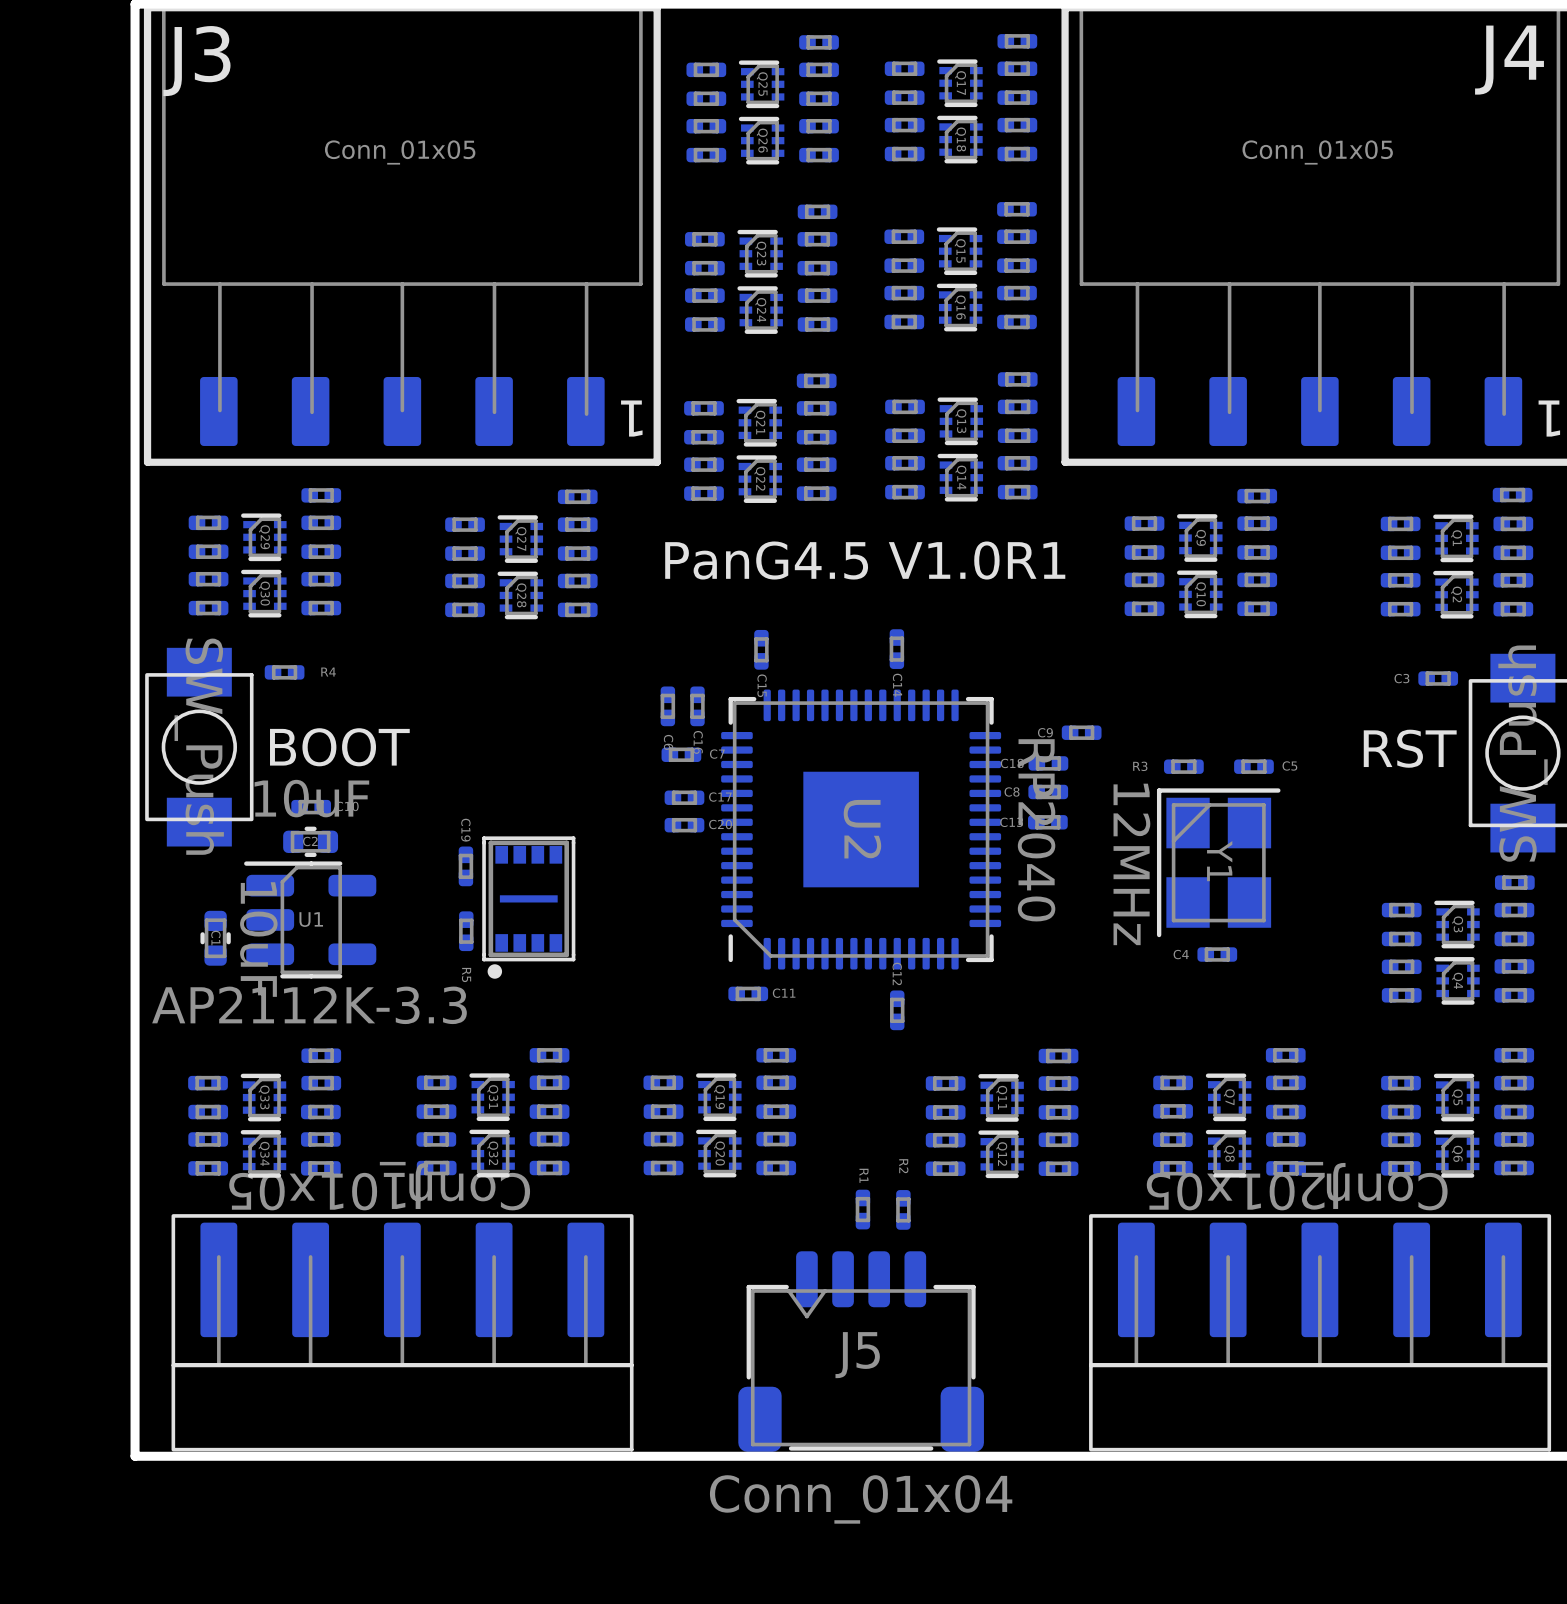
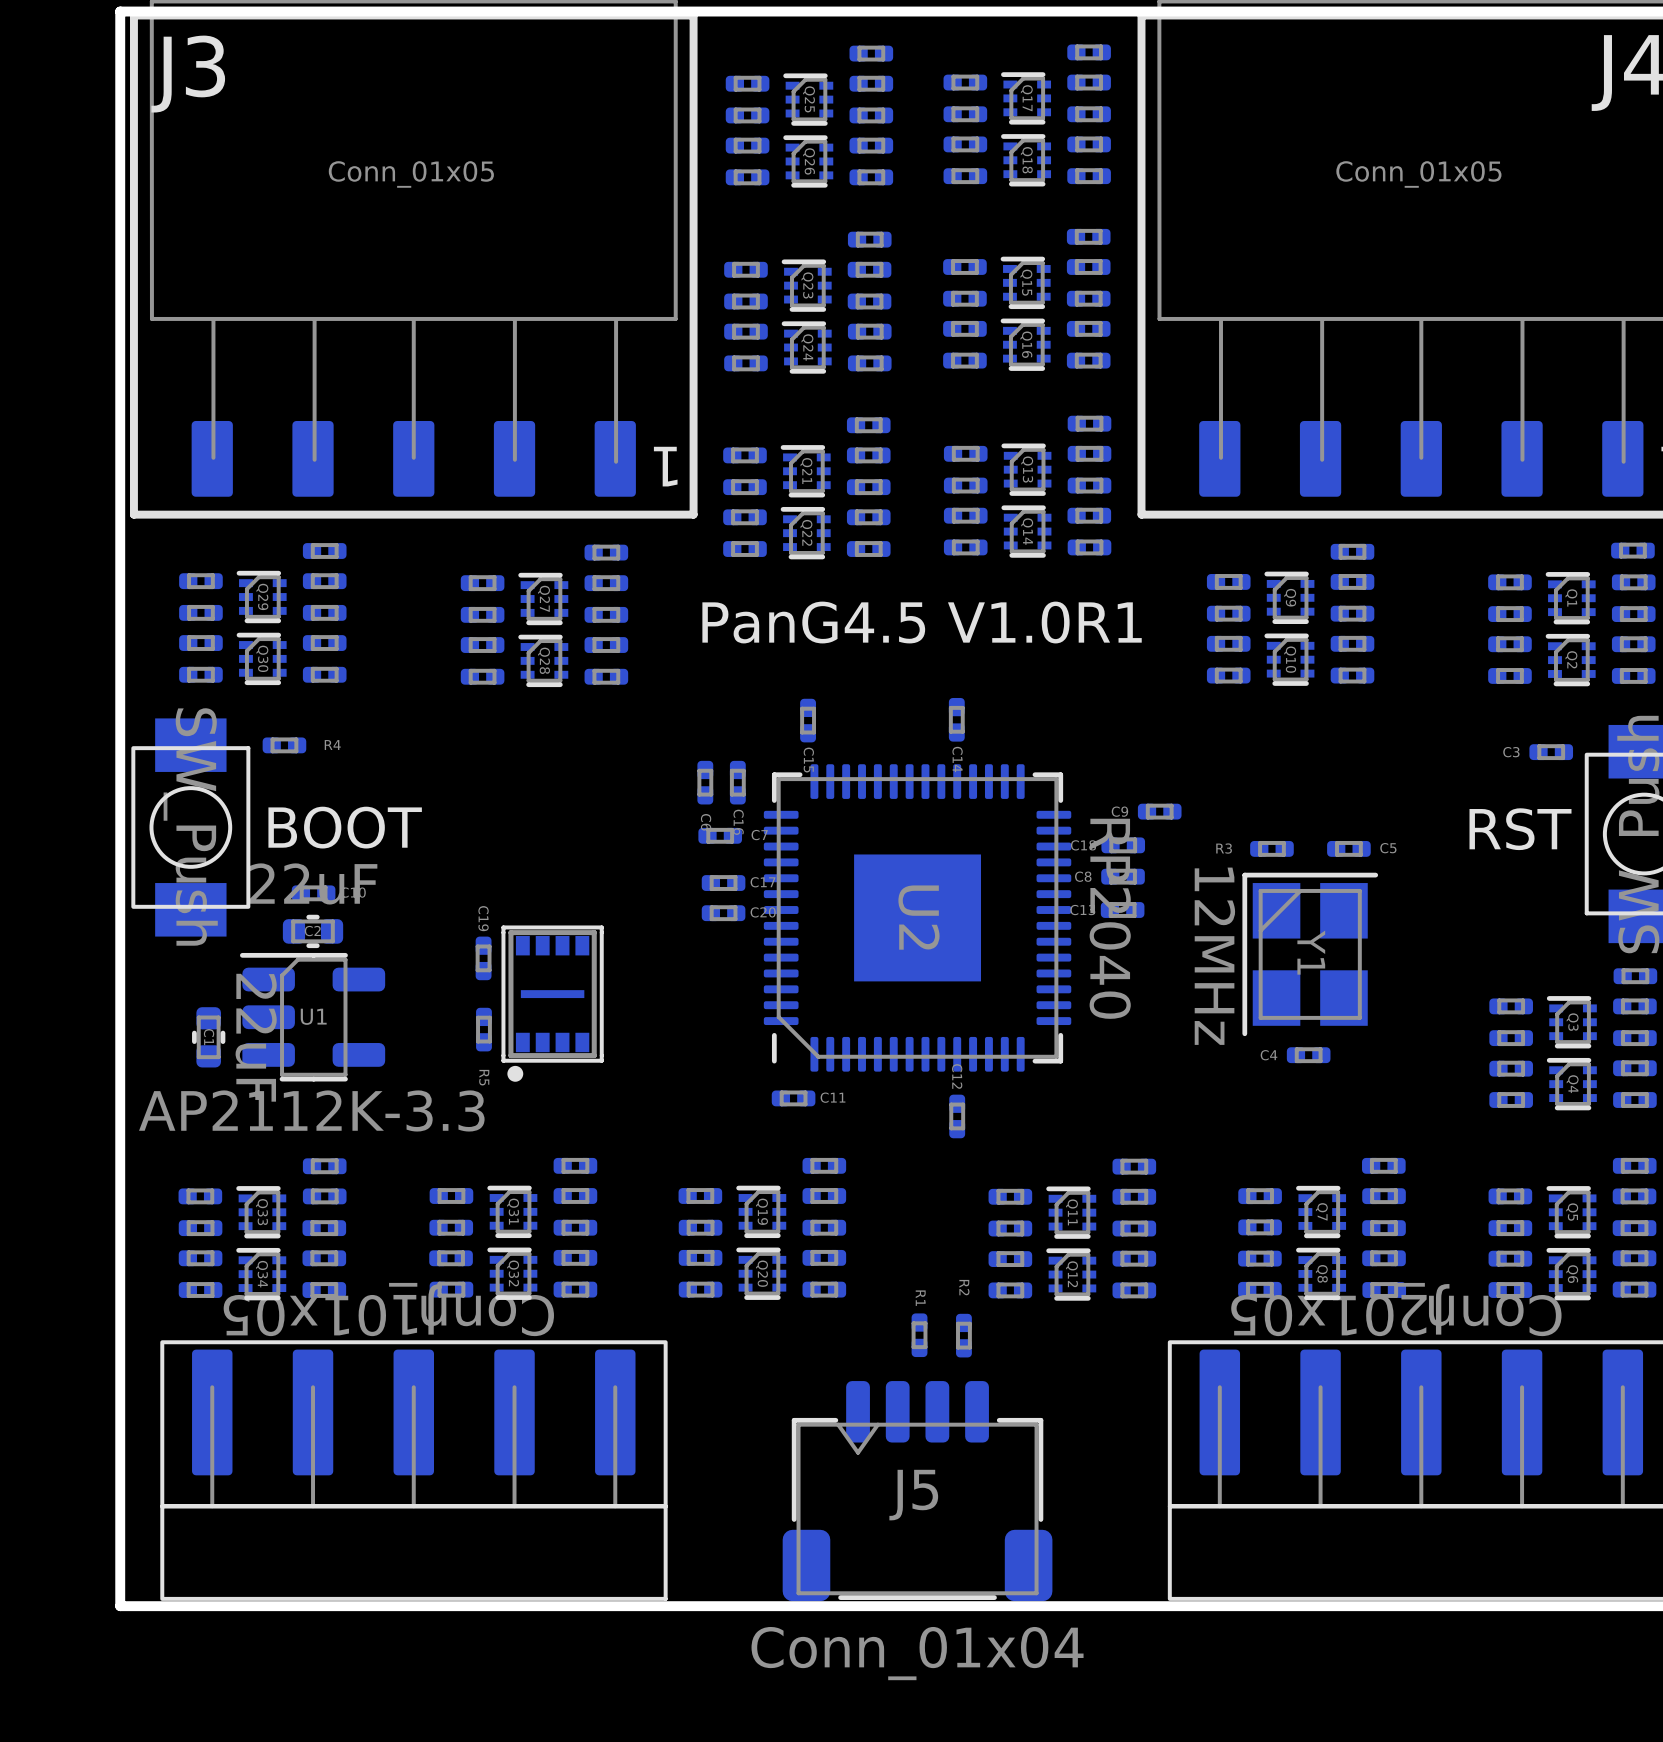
C2 value: 10uF (311, 798) -> 22uF (313, 883)
C1 value: 10uF (258, 939) -> 22uF (256, 1037)

